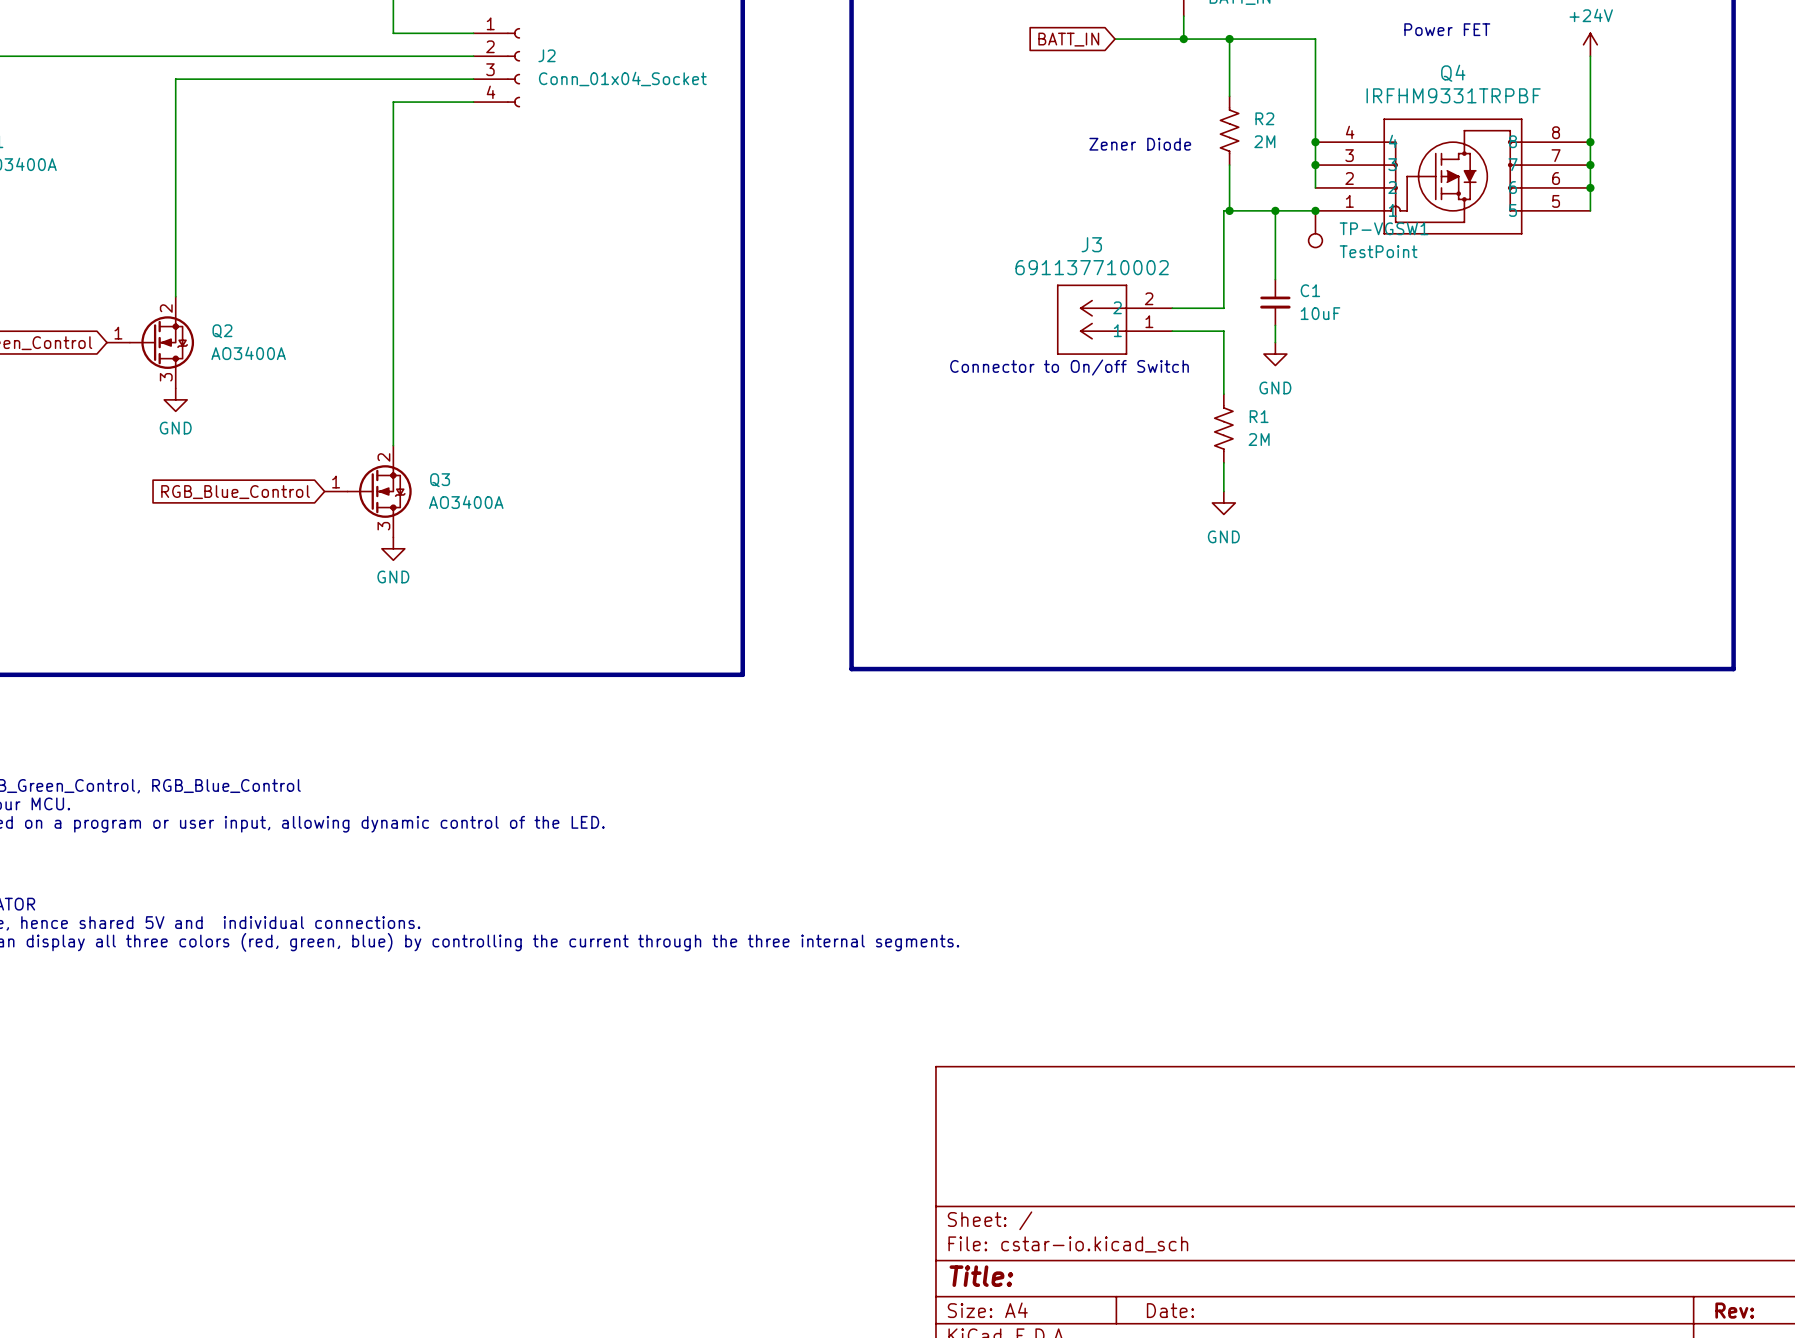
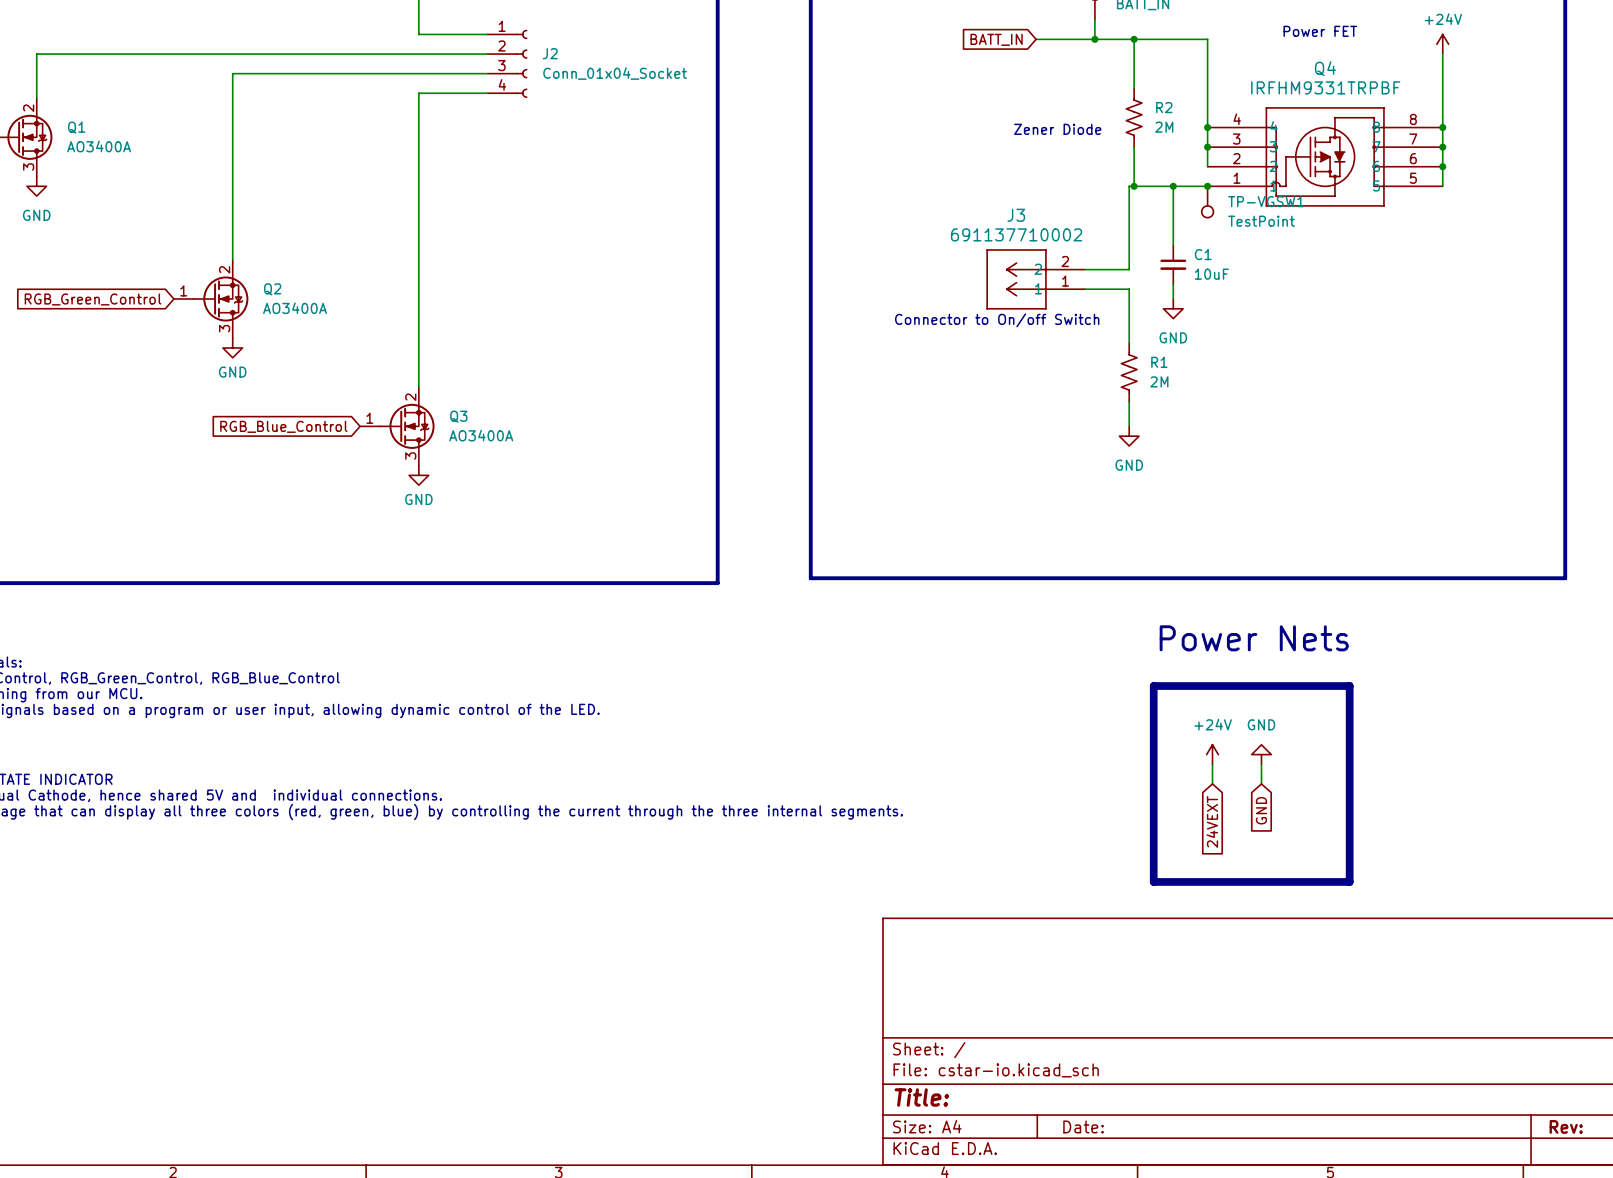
text: none -> Power Nets (1254, 638)
line: none -> (1153, 686) (1349, 686) (1349, 881) (1153, 881) (1153, 686)
power symbol: none -> +24V (1212, 754)
power symbol: none -> GND (1261, 754)
wire: none -> (1212, 764) (1212, 783)
wire: none -> (1261, 764) (1261, 783)
global label: none -> GND (1261, 810)
global label: none -> 24VEXT (1212, 821)

